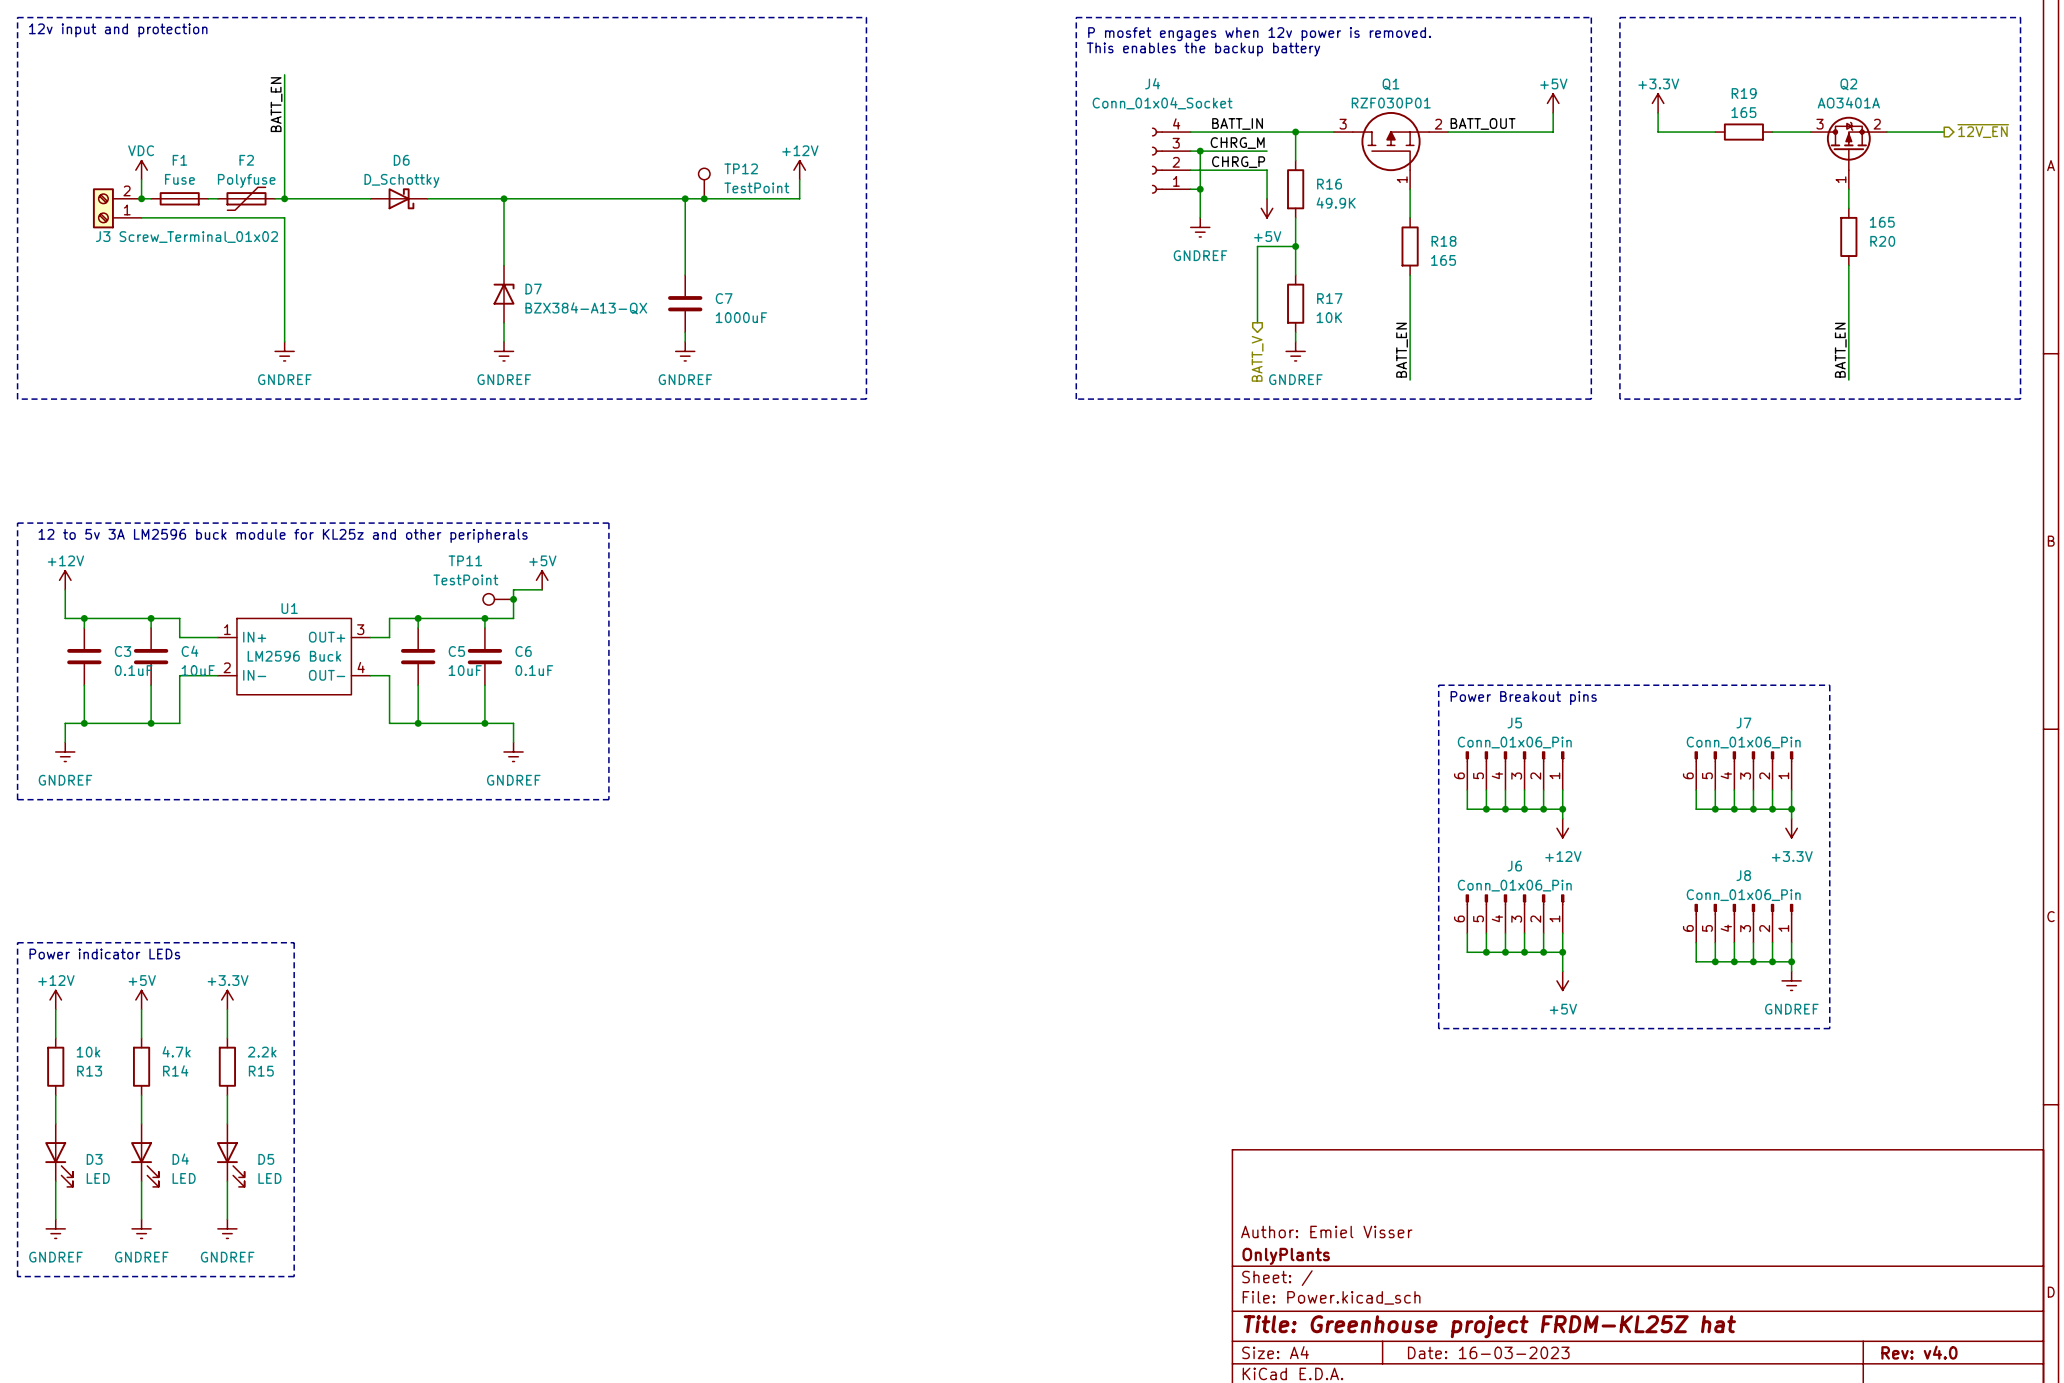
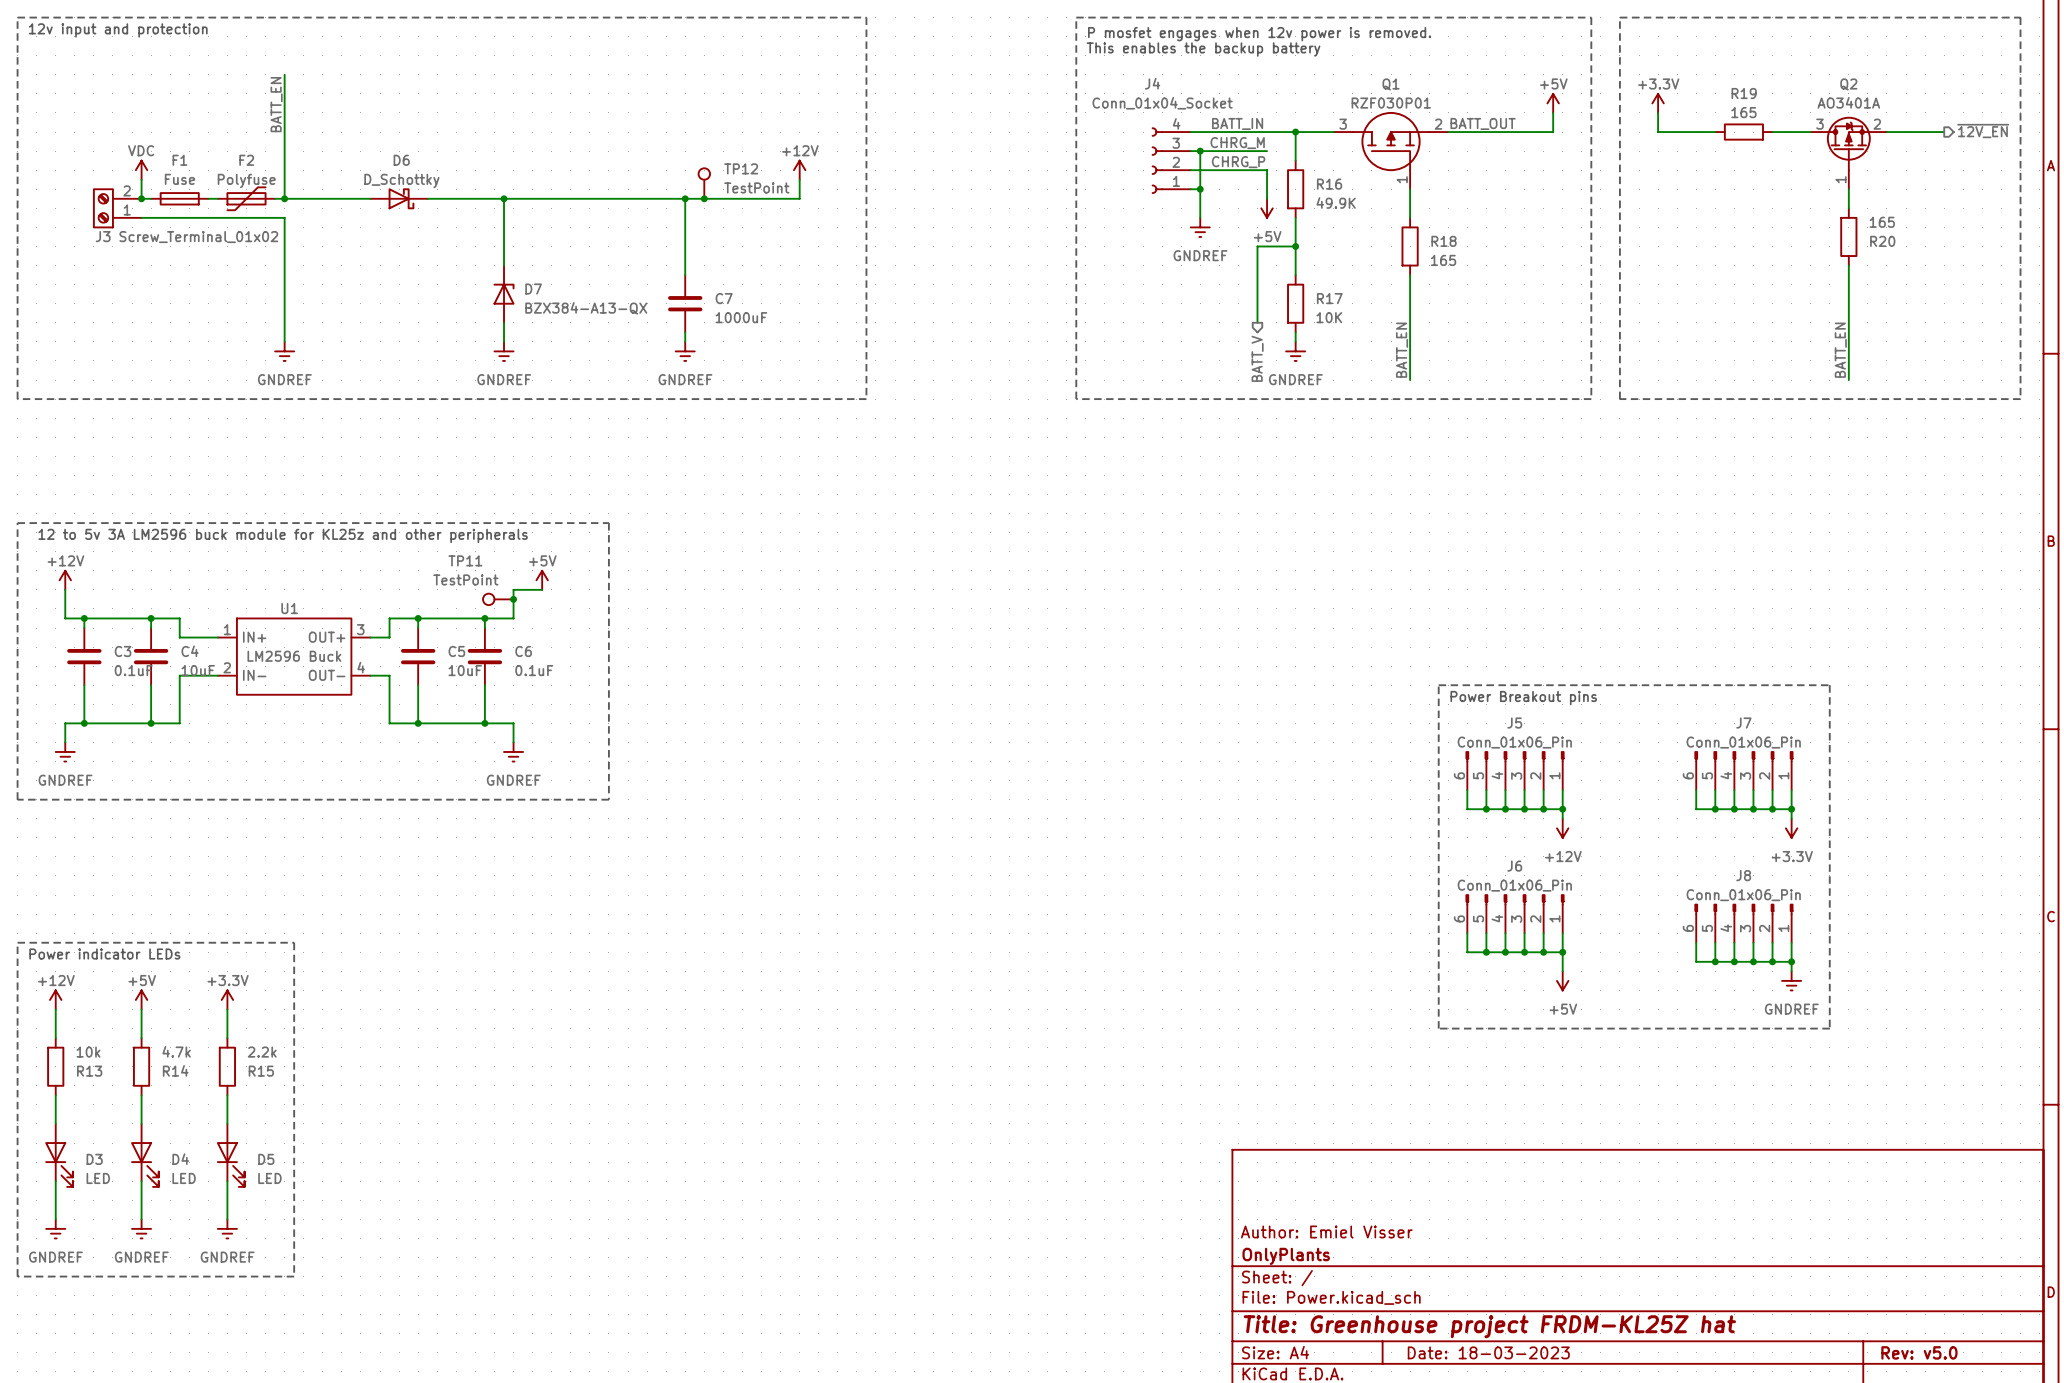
title block: Date: 16-03-2023 (1488, 1352) -> Date: 18-03-2023 (1488, 1352)
title block: Rev: v4.0 (1919, 1352) -> Rev: v5.0 (1919, 1352)

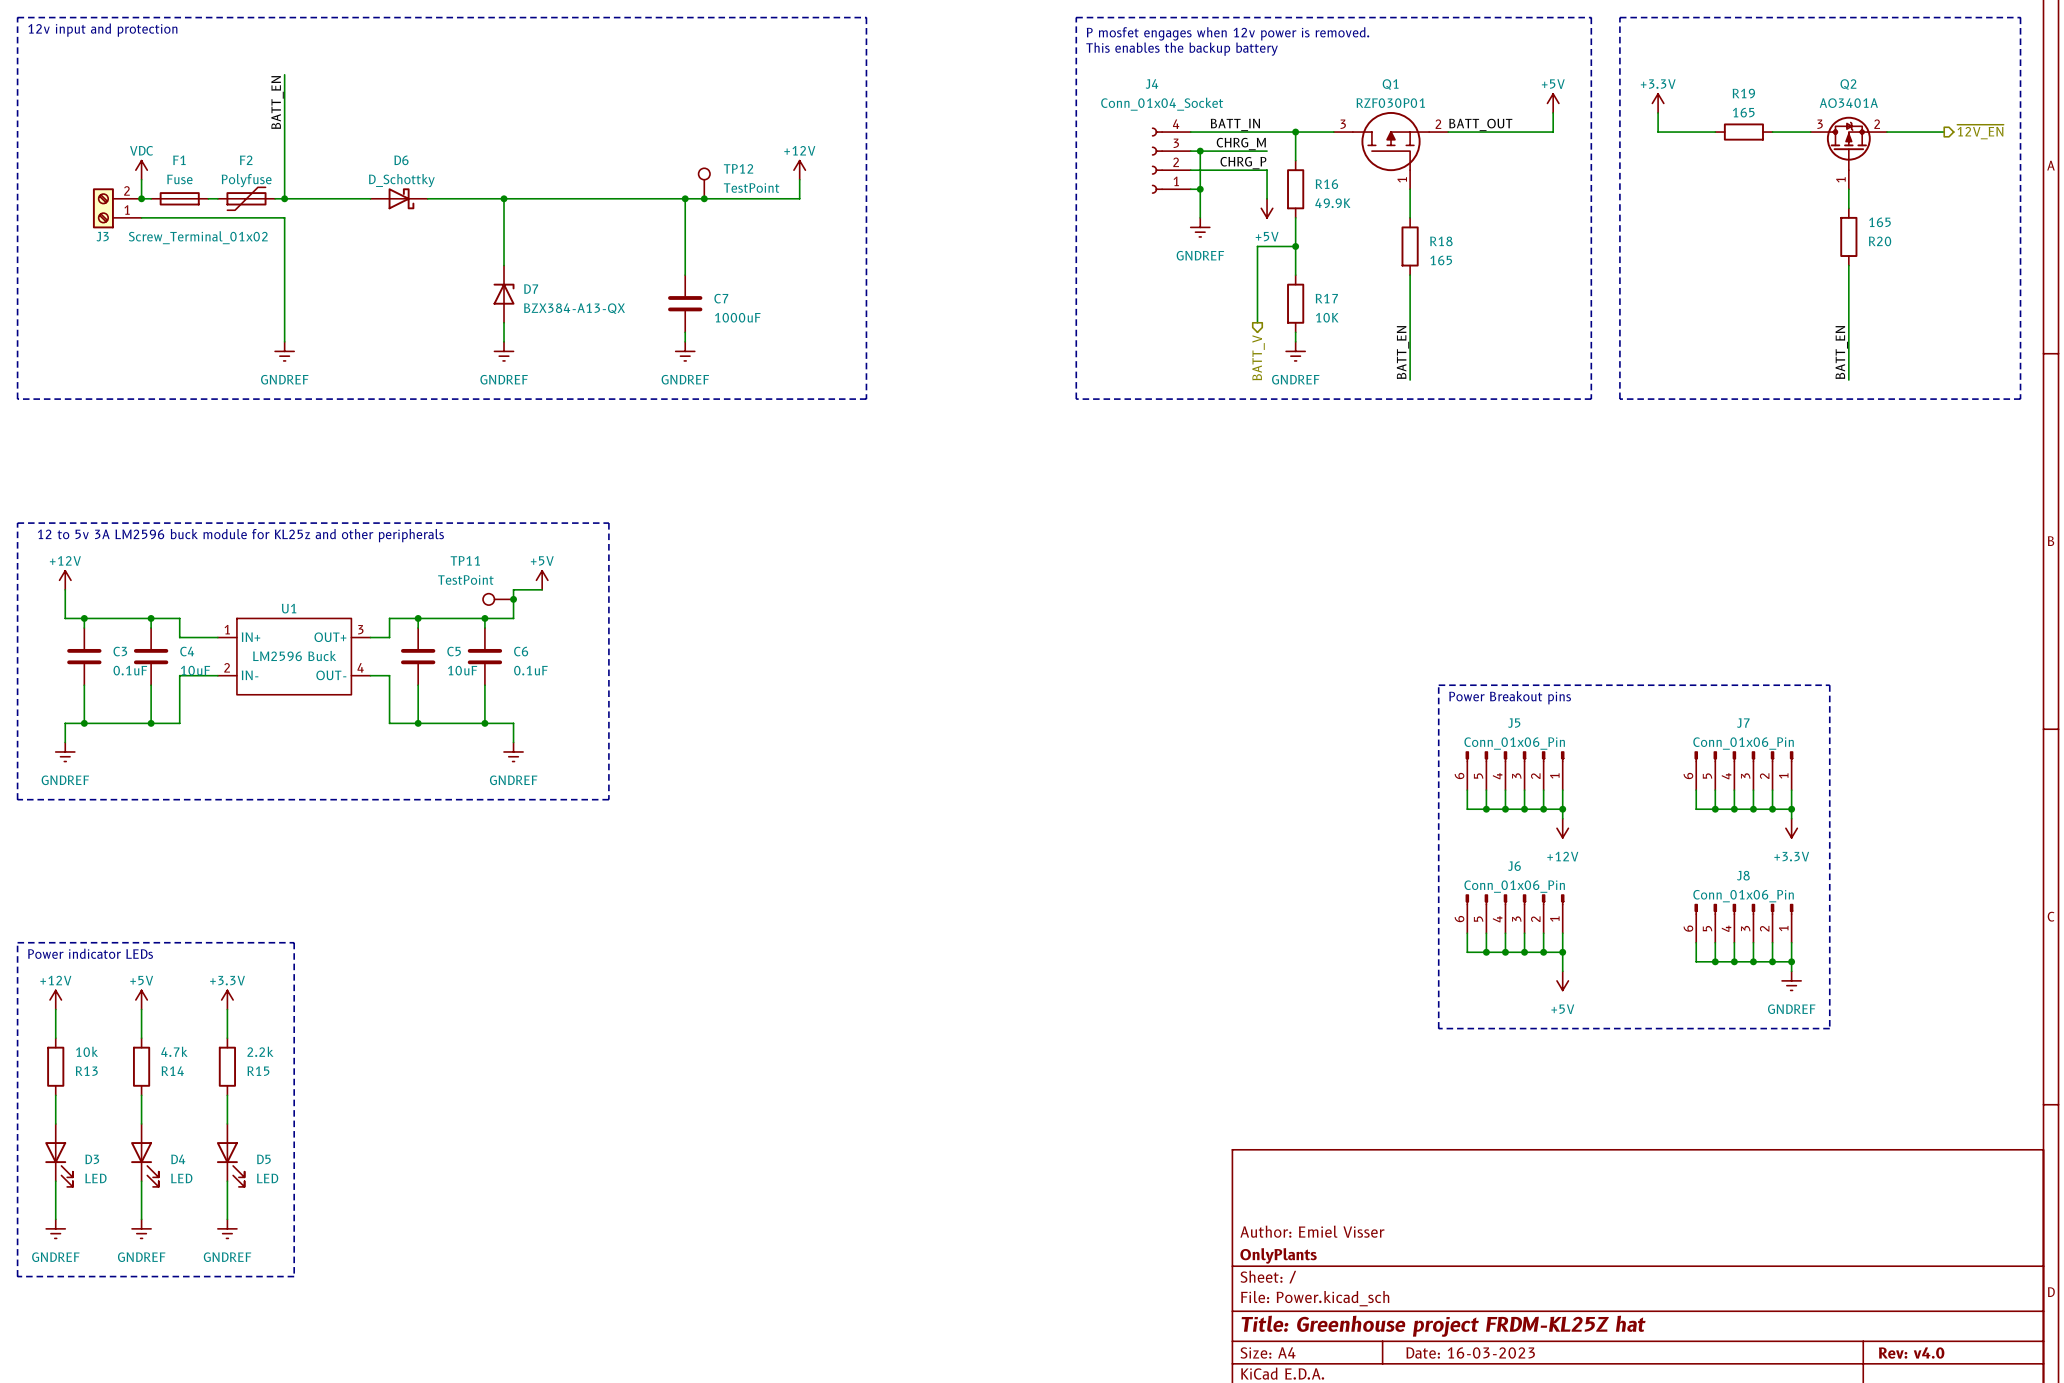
title block: Date: 18-03-2023 (1488, 1352) -> Date: 16-03-2023 (1470, 1352)
title block: Rev: v5.0 (1919, 1352) -> Rev: v4.0 (1911, 1352)

